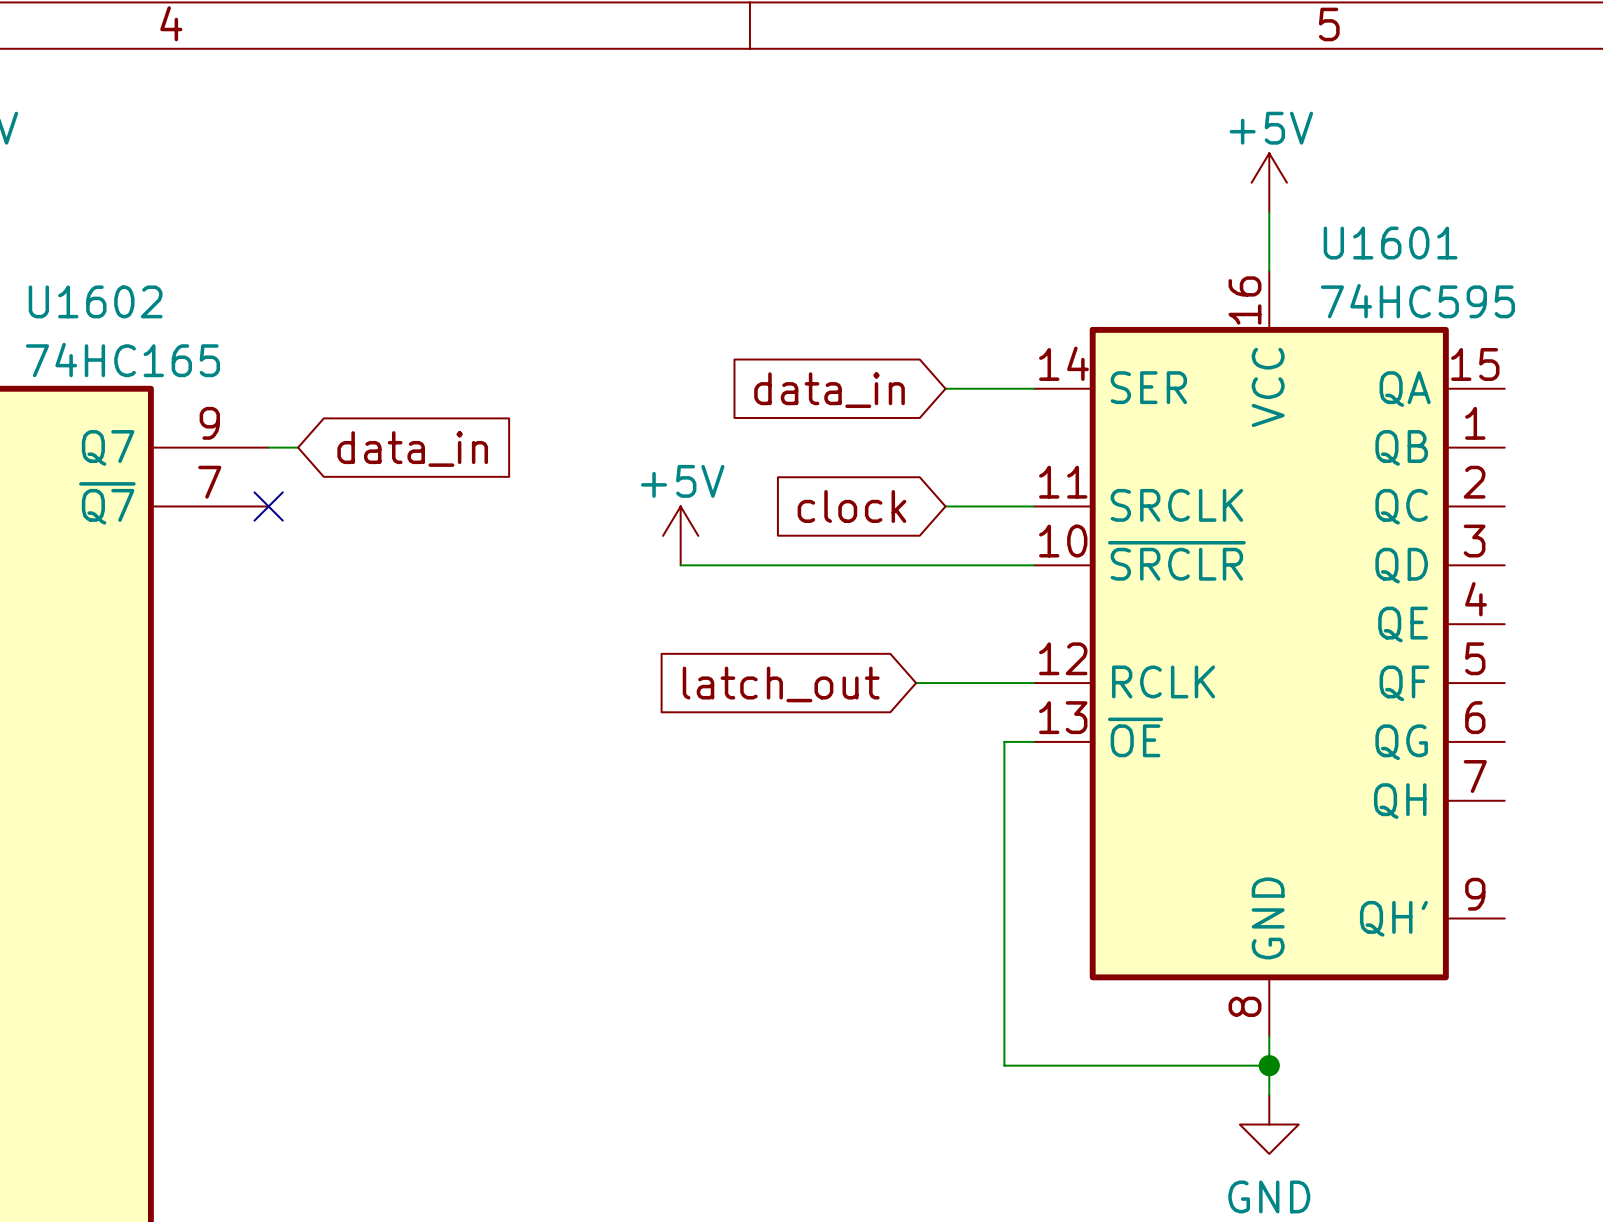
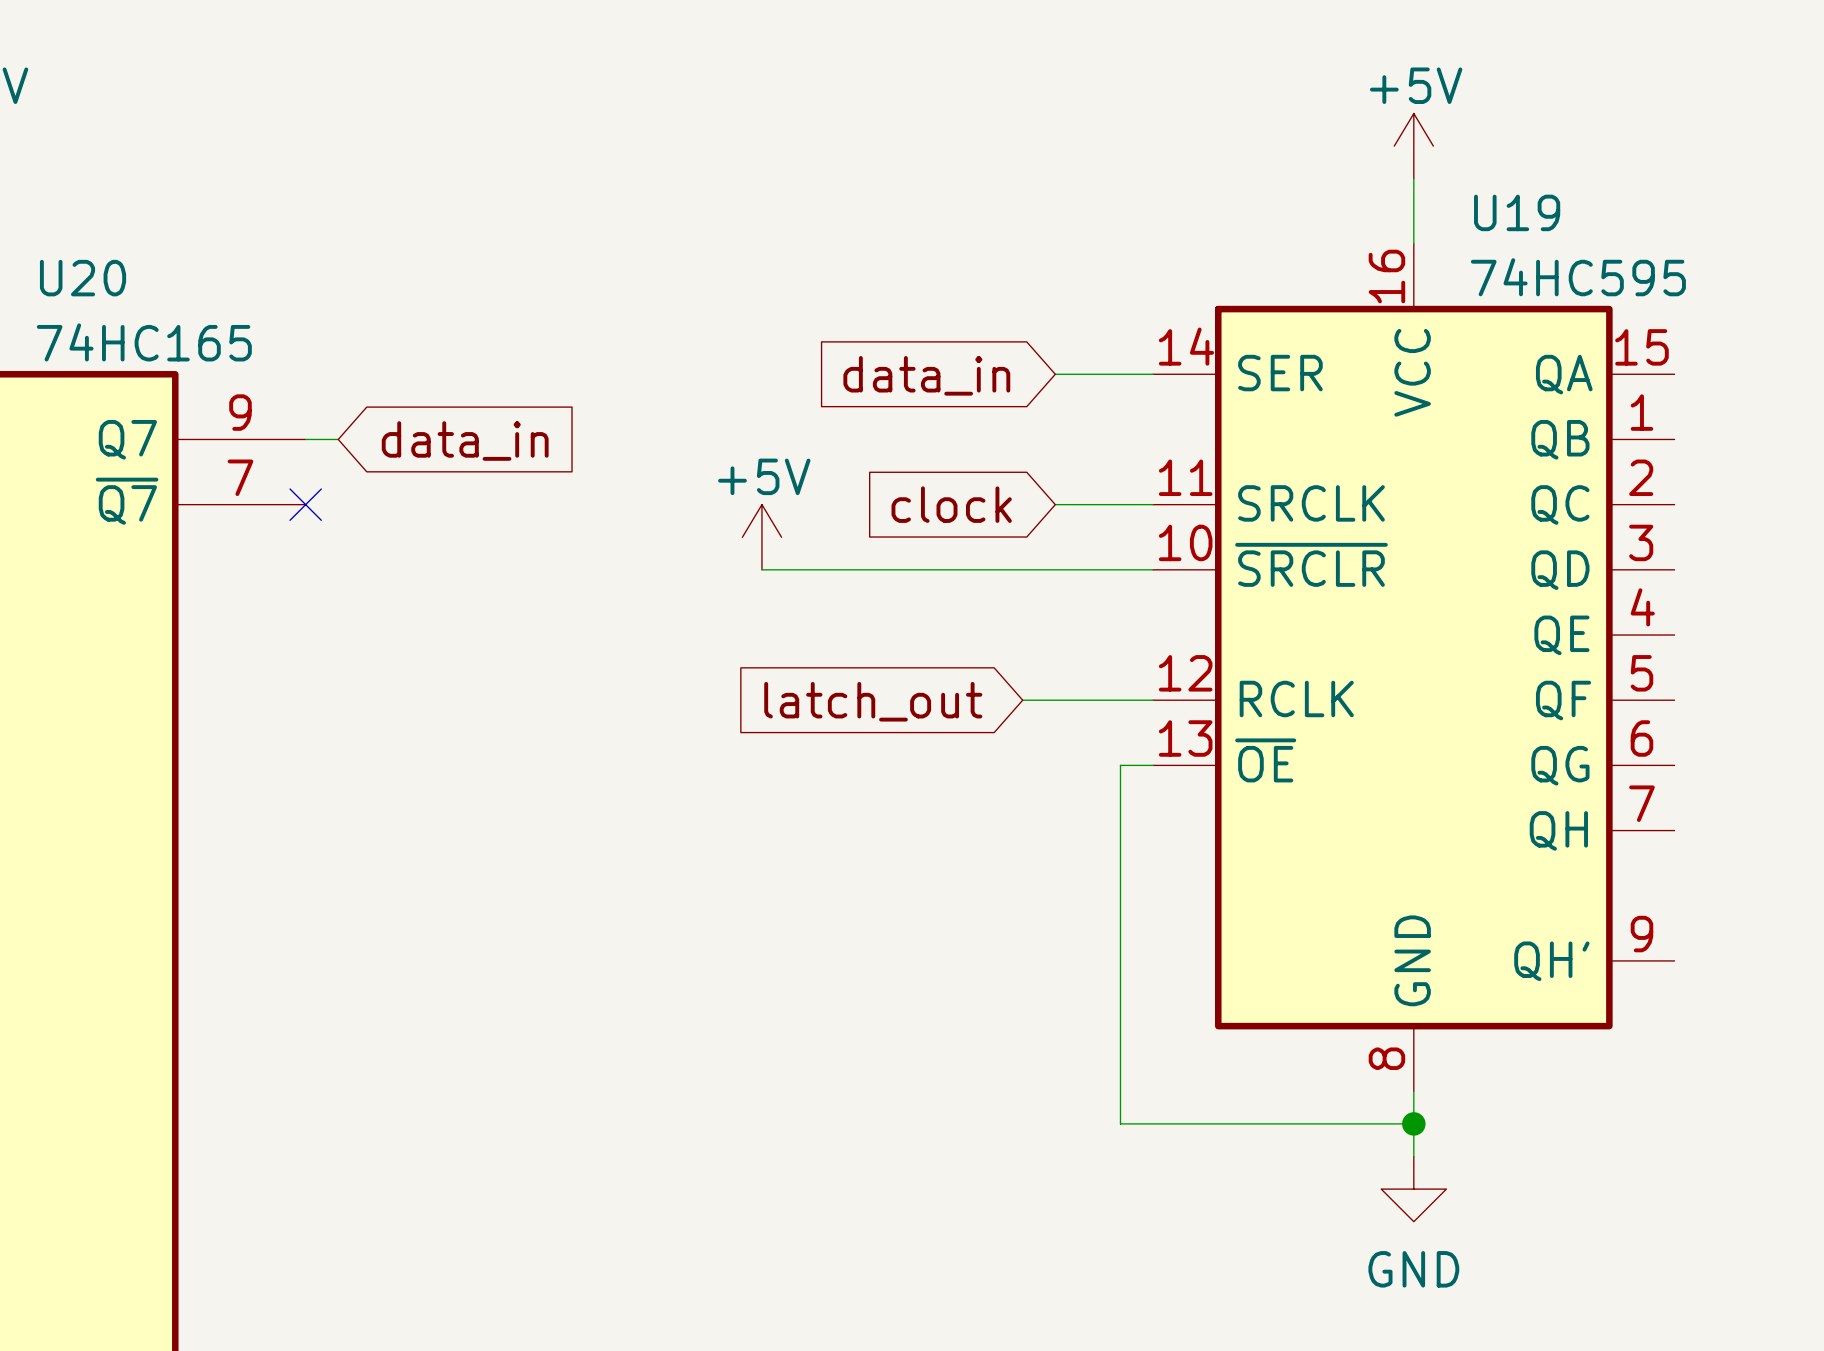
U1601 name: U1601 (1390, 243) -> U19 (1517, 212)
U1602 name: U1602 (95, 301) -> U20 (83, 278)

